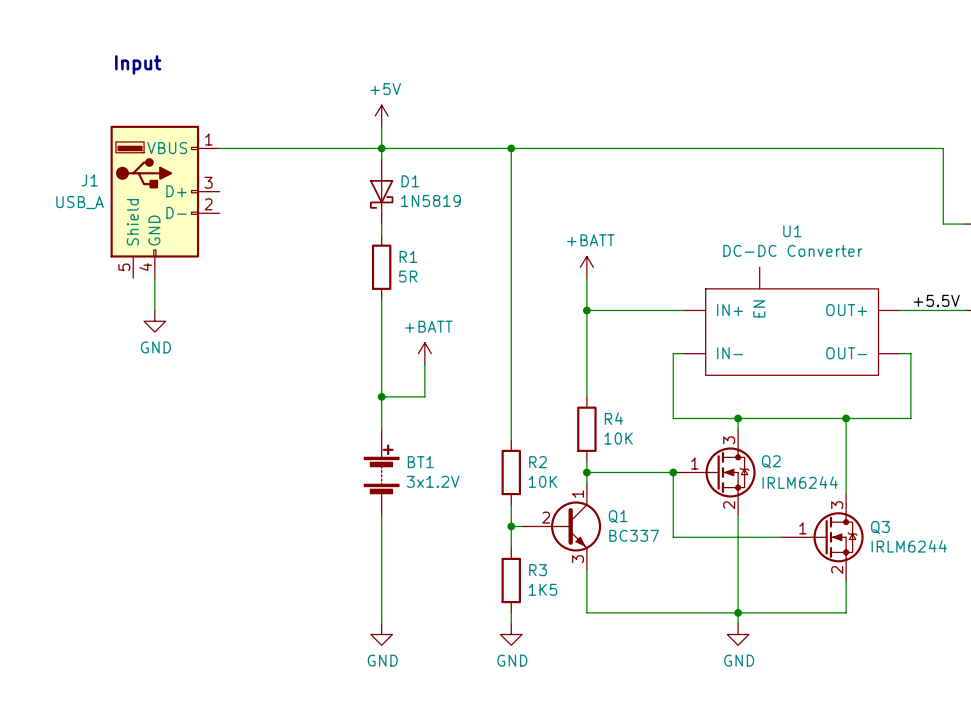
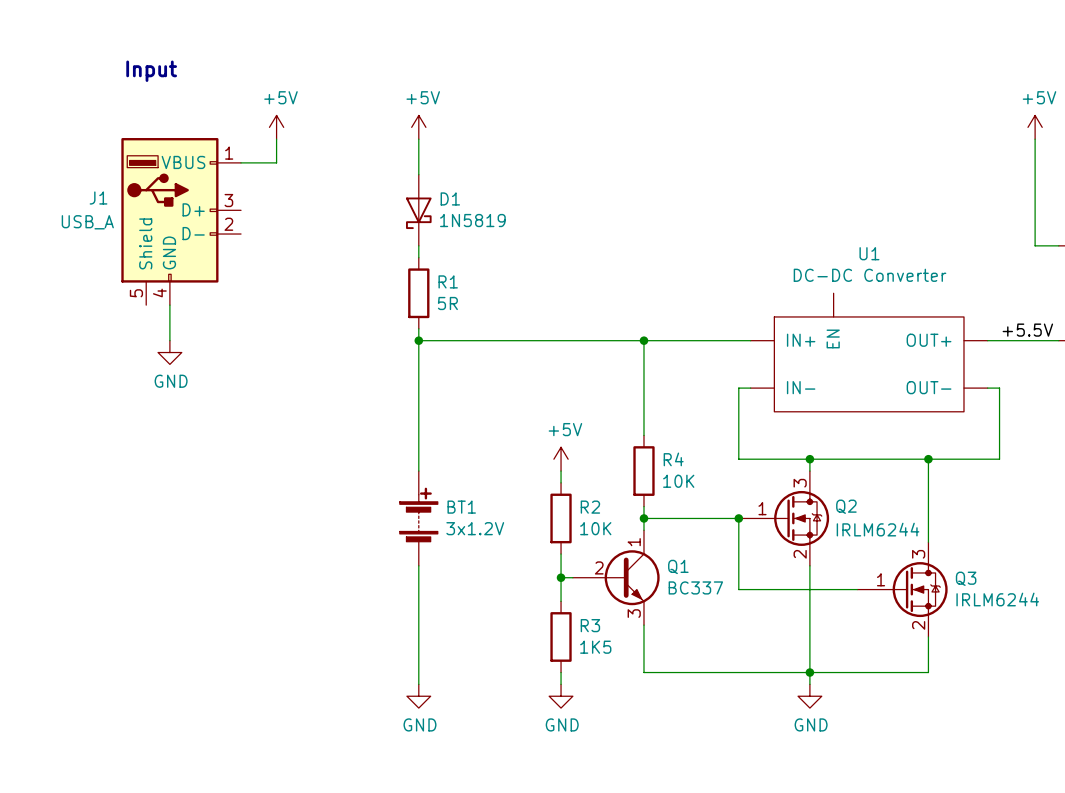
power symbol: none -> +5V (276, 127)
power symbol: none -> +5V (1035, 127)
wire: none -> (1035, 139) (1035, 162)
wire: (252, 148) (943, 148) -> (276, 162) (276, 139)
junction: (381, 148) -> none
wire: (511, 148) (511, 429) -> none
junction: (511, 148) -> none
power symbol: +BATT (586, 267) -> none
wire: (586, 278) (586, 310) -> (418, 340) (643, 340)
junction: none -> (418, 340)
power symbol: +BATT (424, 353) -> none
wire: (424, 364) (424, 396) (381, 396) -> none
junction: (381, 396) -> none
power symbol: none -> +5V (561, 459)

